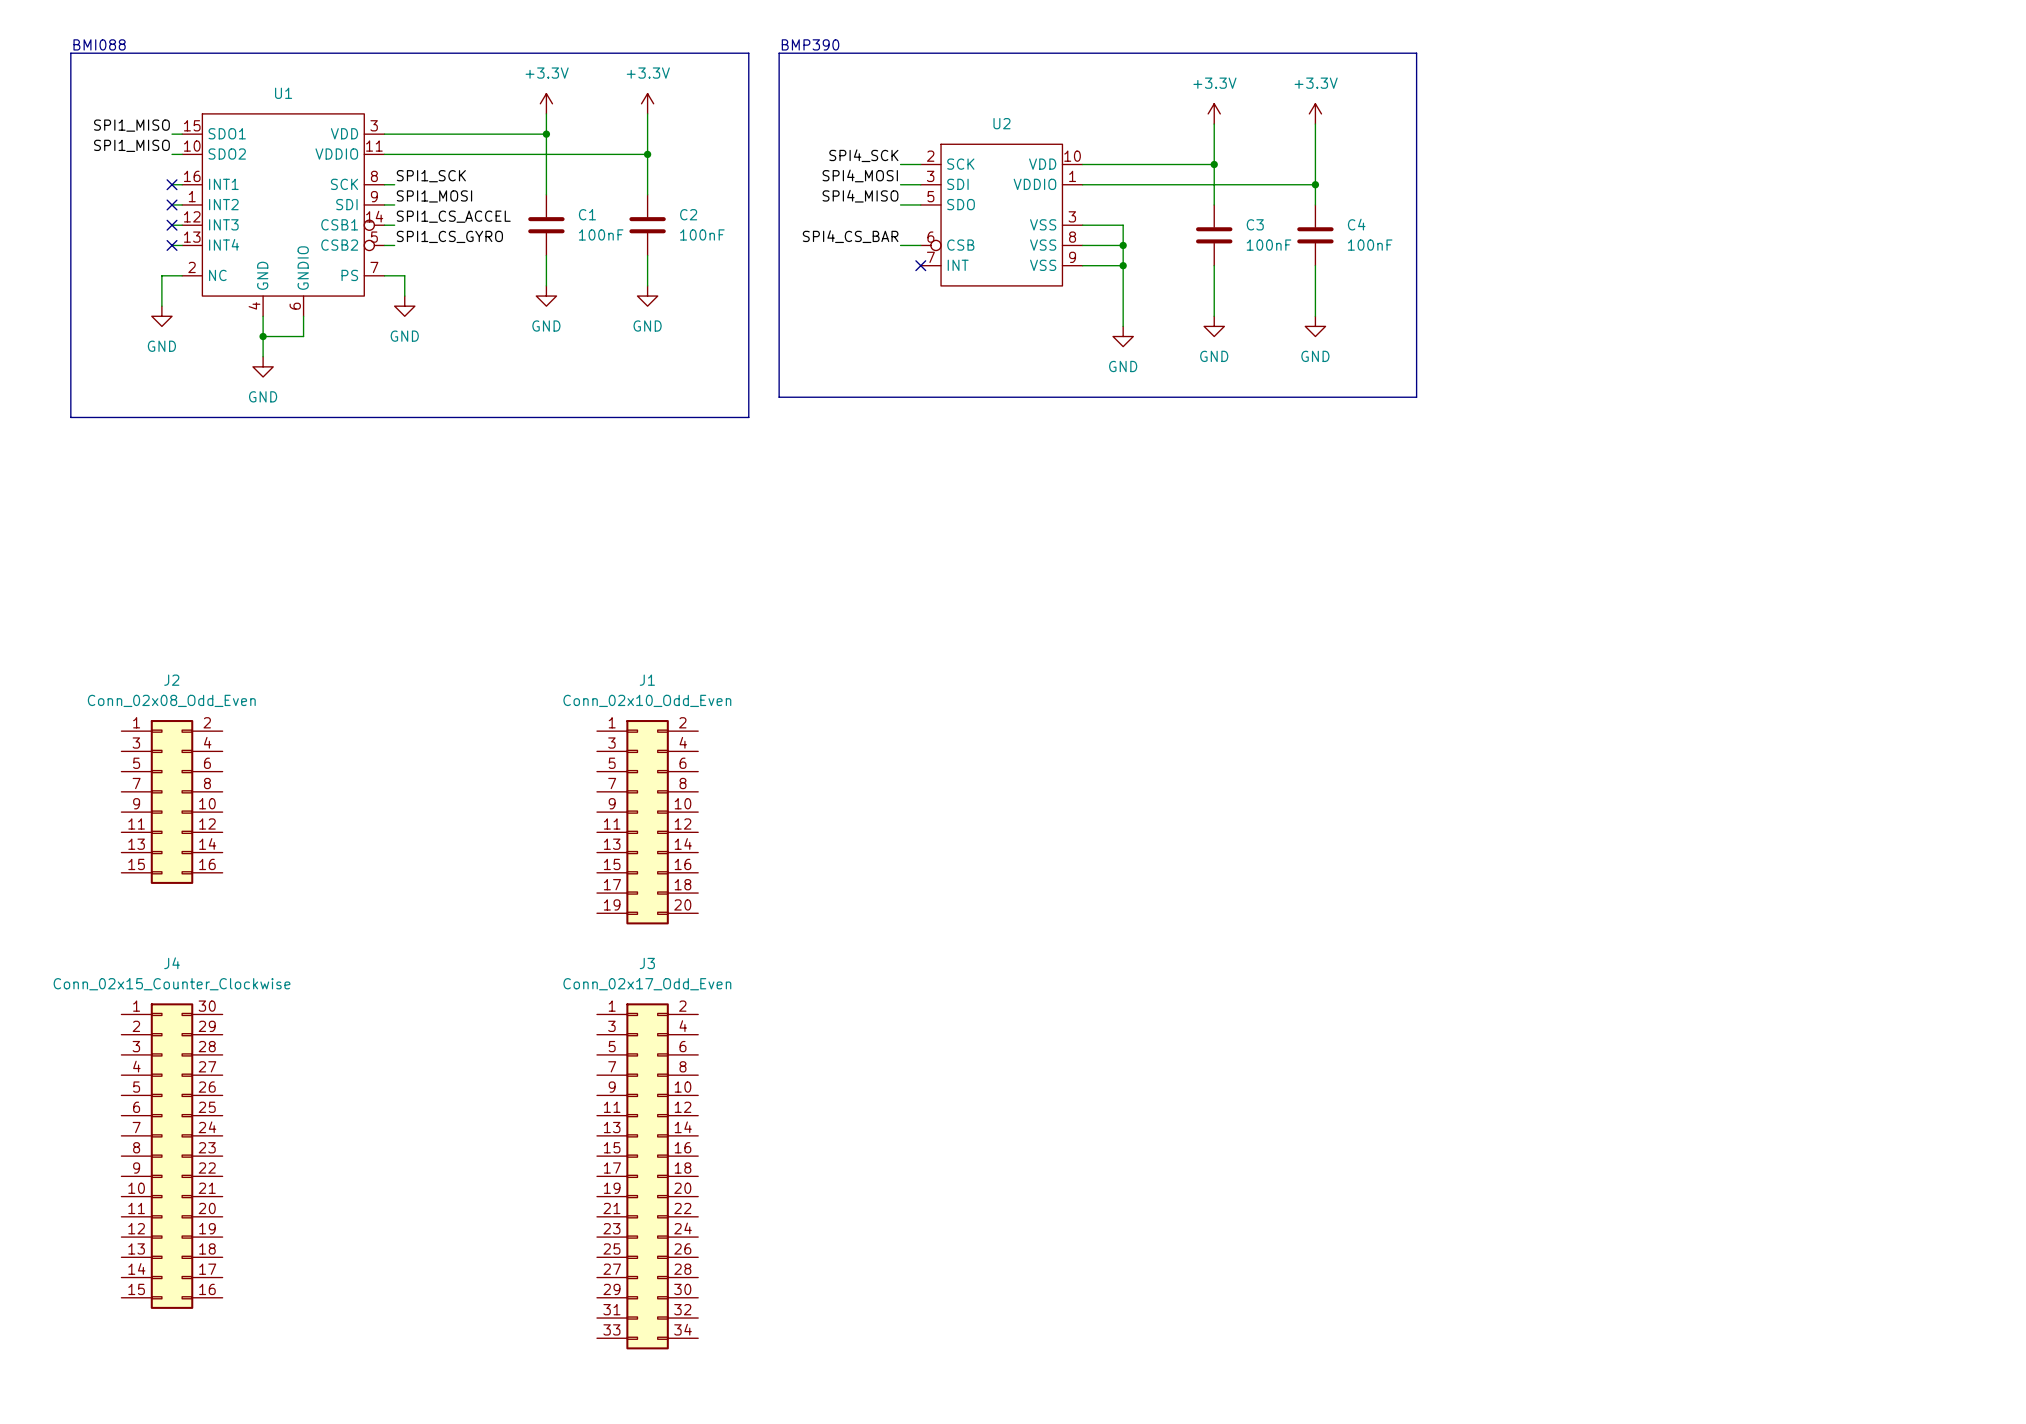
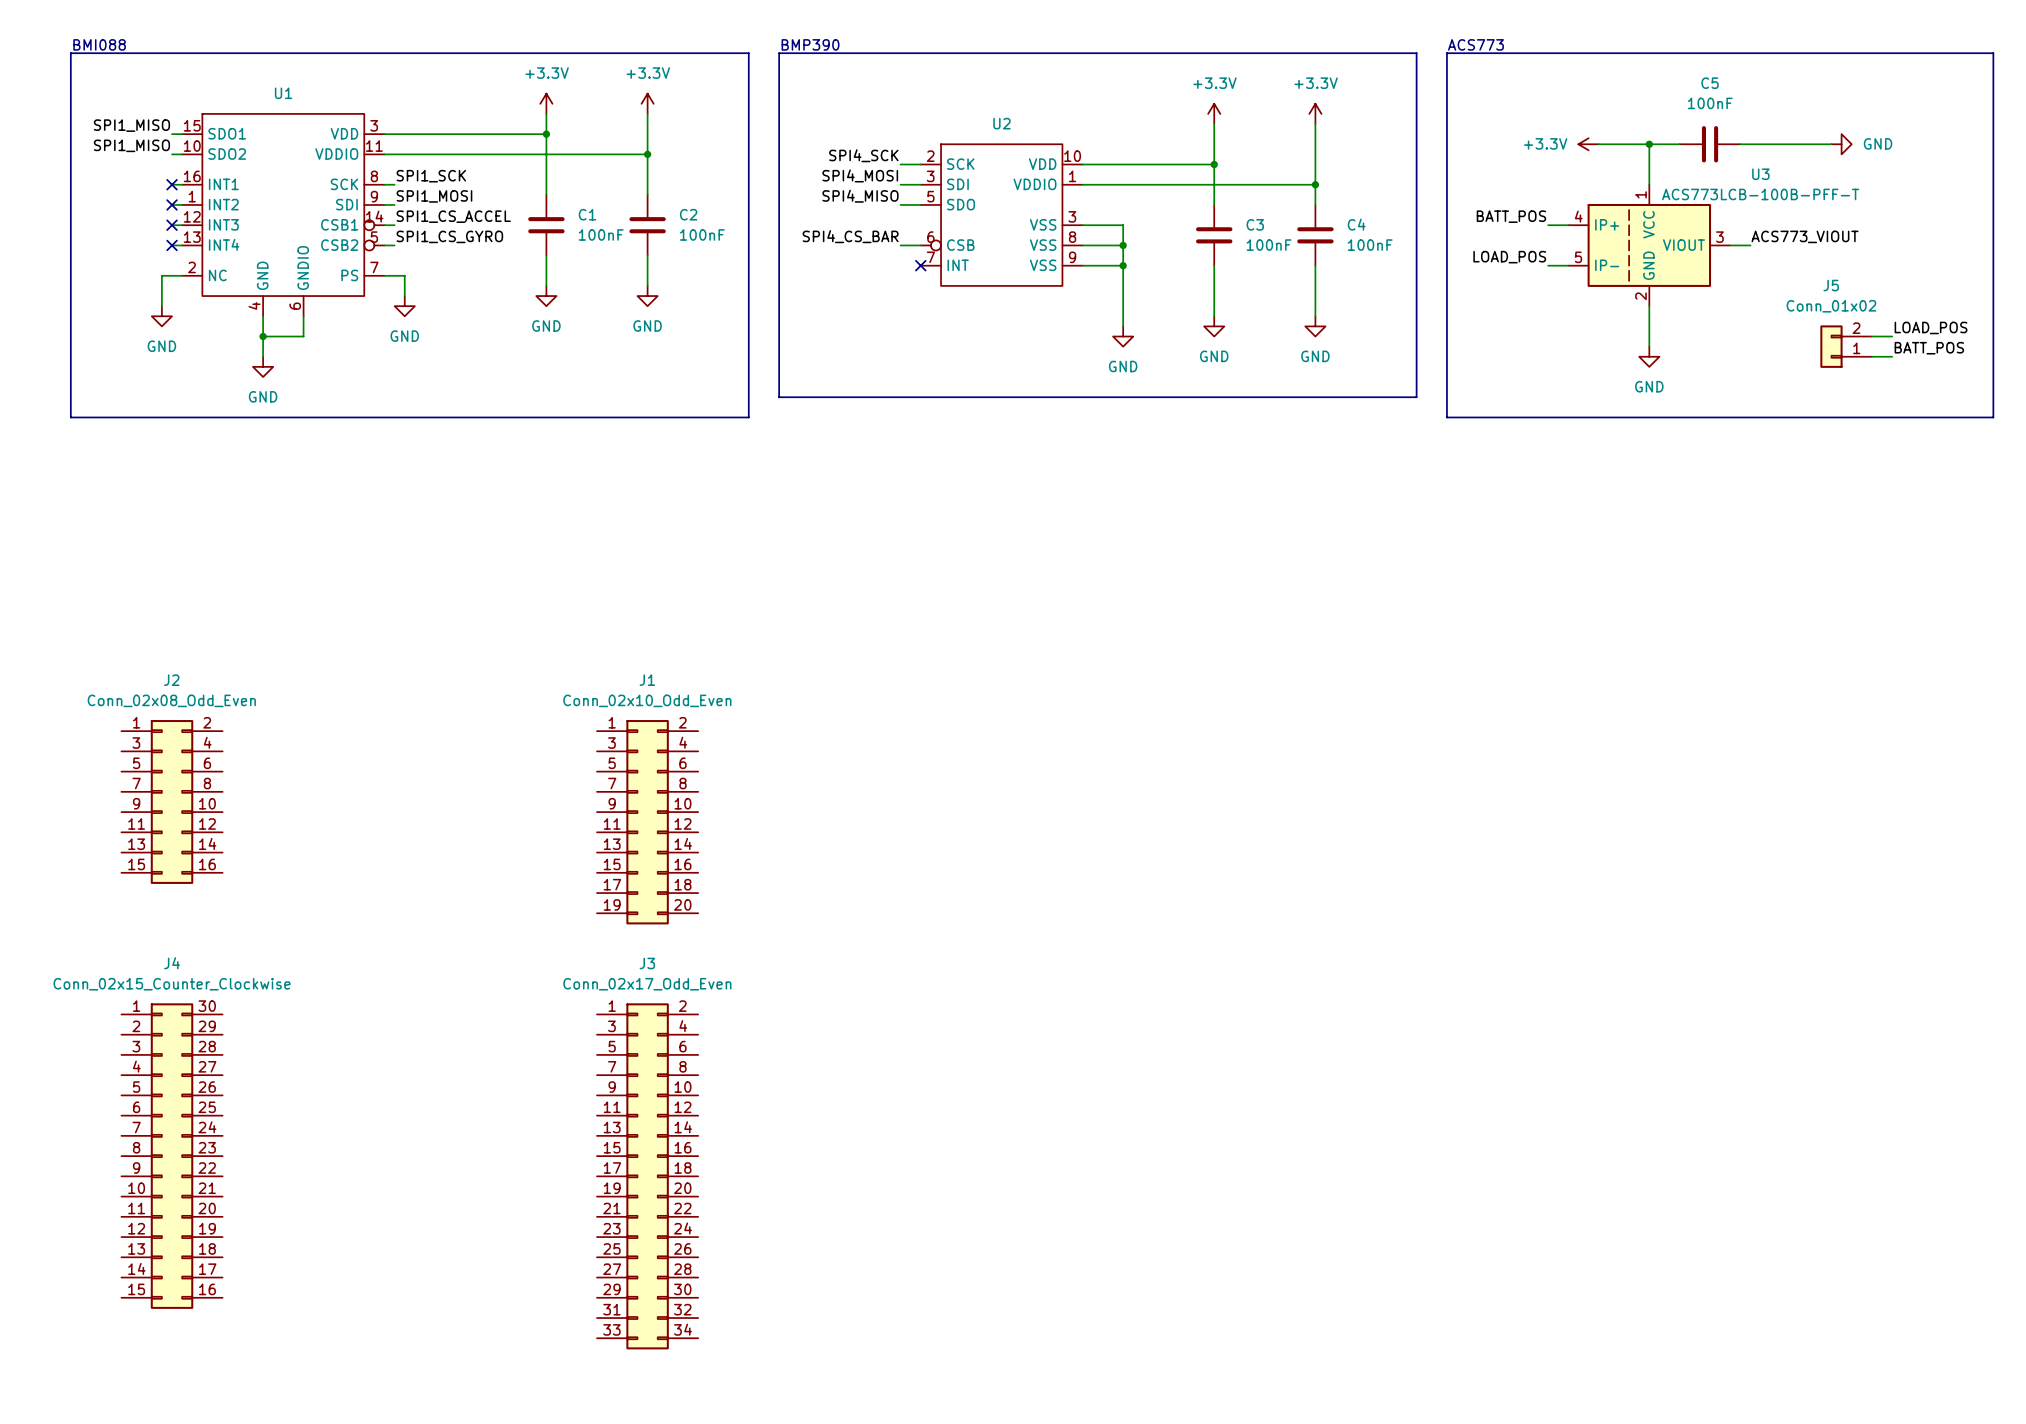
text: none -> ACS773 (1475, 44)
line: none -> (1446, 53) (1993, 53) (1993, 417) (1446, 417) (1446, 53)
power symbol: none -> +3.3V (1588, 144)
wire: none -> (1598, 144) (1679, 144)
wire: none -> (1649, 144) (1649, 184)
junction: none -> (1649, 144)
C5: none -> 100nF (1710, 144)
wire: none -> (1740, 144) (1831, 144)
power symbol: none -> GND (1841, 144)
label: none -> BATT_POS (1511, 216)
wire: none -> (1548, 225) (1568, 225)
label: none -> ACS773_VIOUT (1805, 236)
U3: none -> ACS773LCB-100B-PFF-T (1649, 245)
wire: none -> (1730, 245) (1750, 245)
label: none -> LOAD_POS (1509, 257)
wire: none -> (1548, 265) (1568, 265)
wire: none -> (1649, 306) (1649, 346)
label: none -> LOAD_POS (1931, 327)
wire: none -> (1871, 336) (1892, 336)
J5: none -> Conn_01x02 (1846, 346)
label: none -> BATT_POS (1929, 348)
power symbol: none -> GND (1649, 356)
wire: none -> (1871, 356) (1892, 356)

